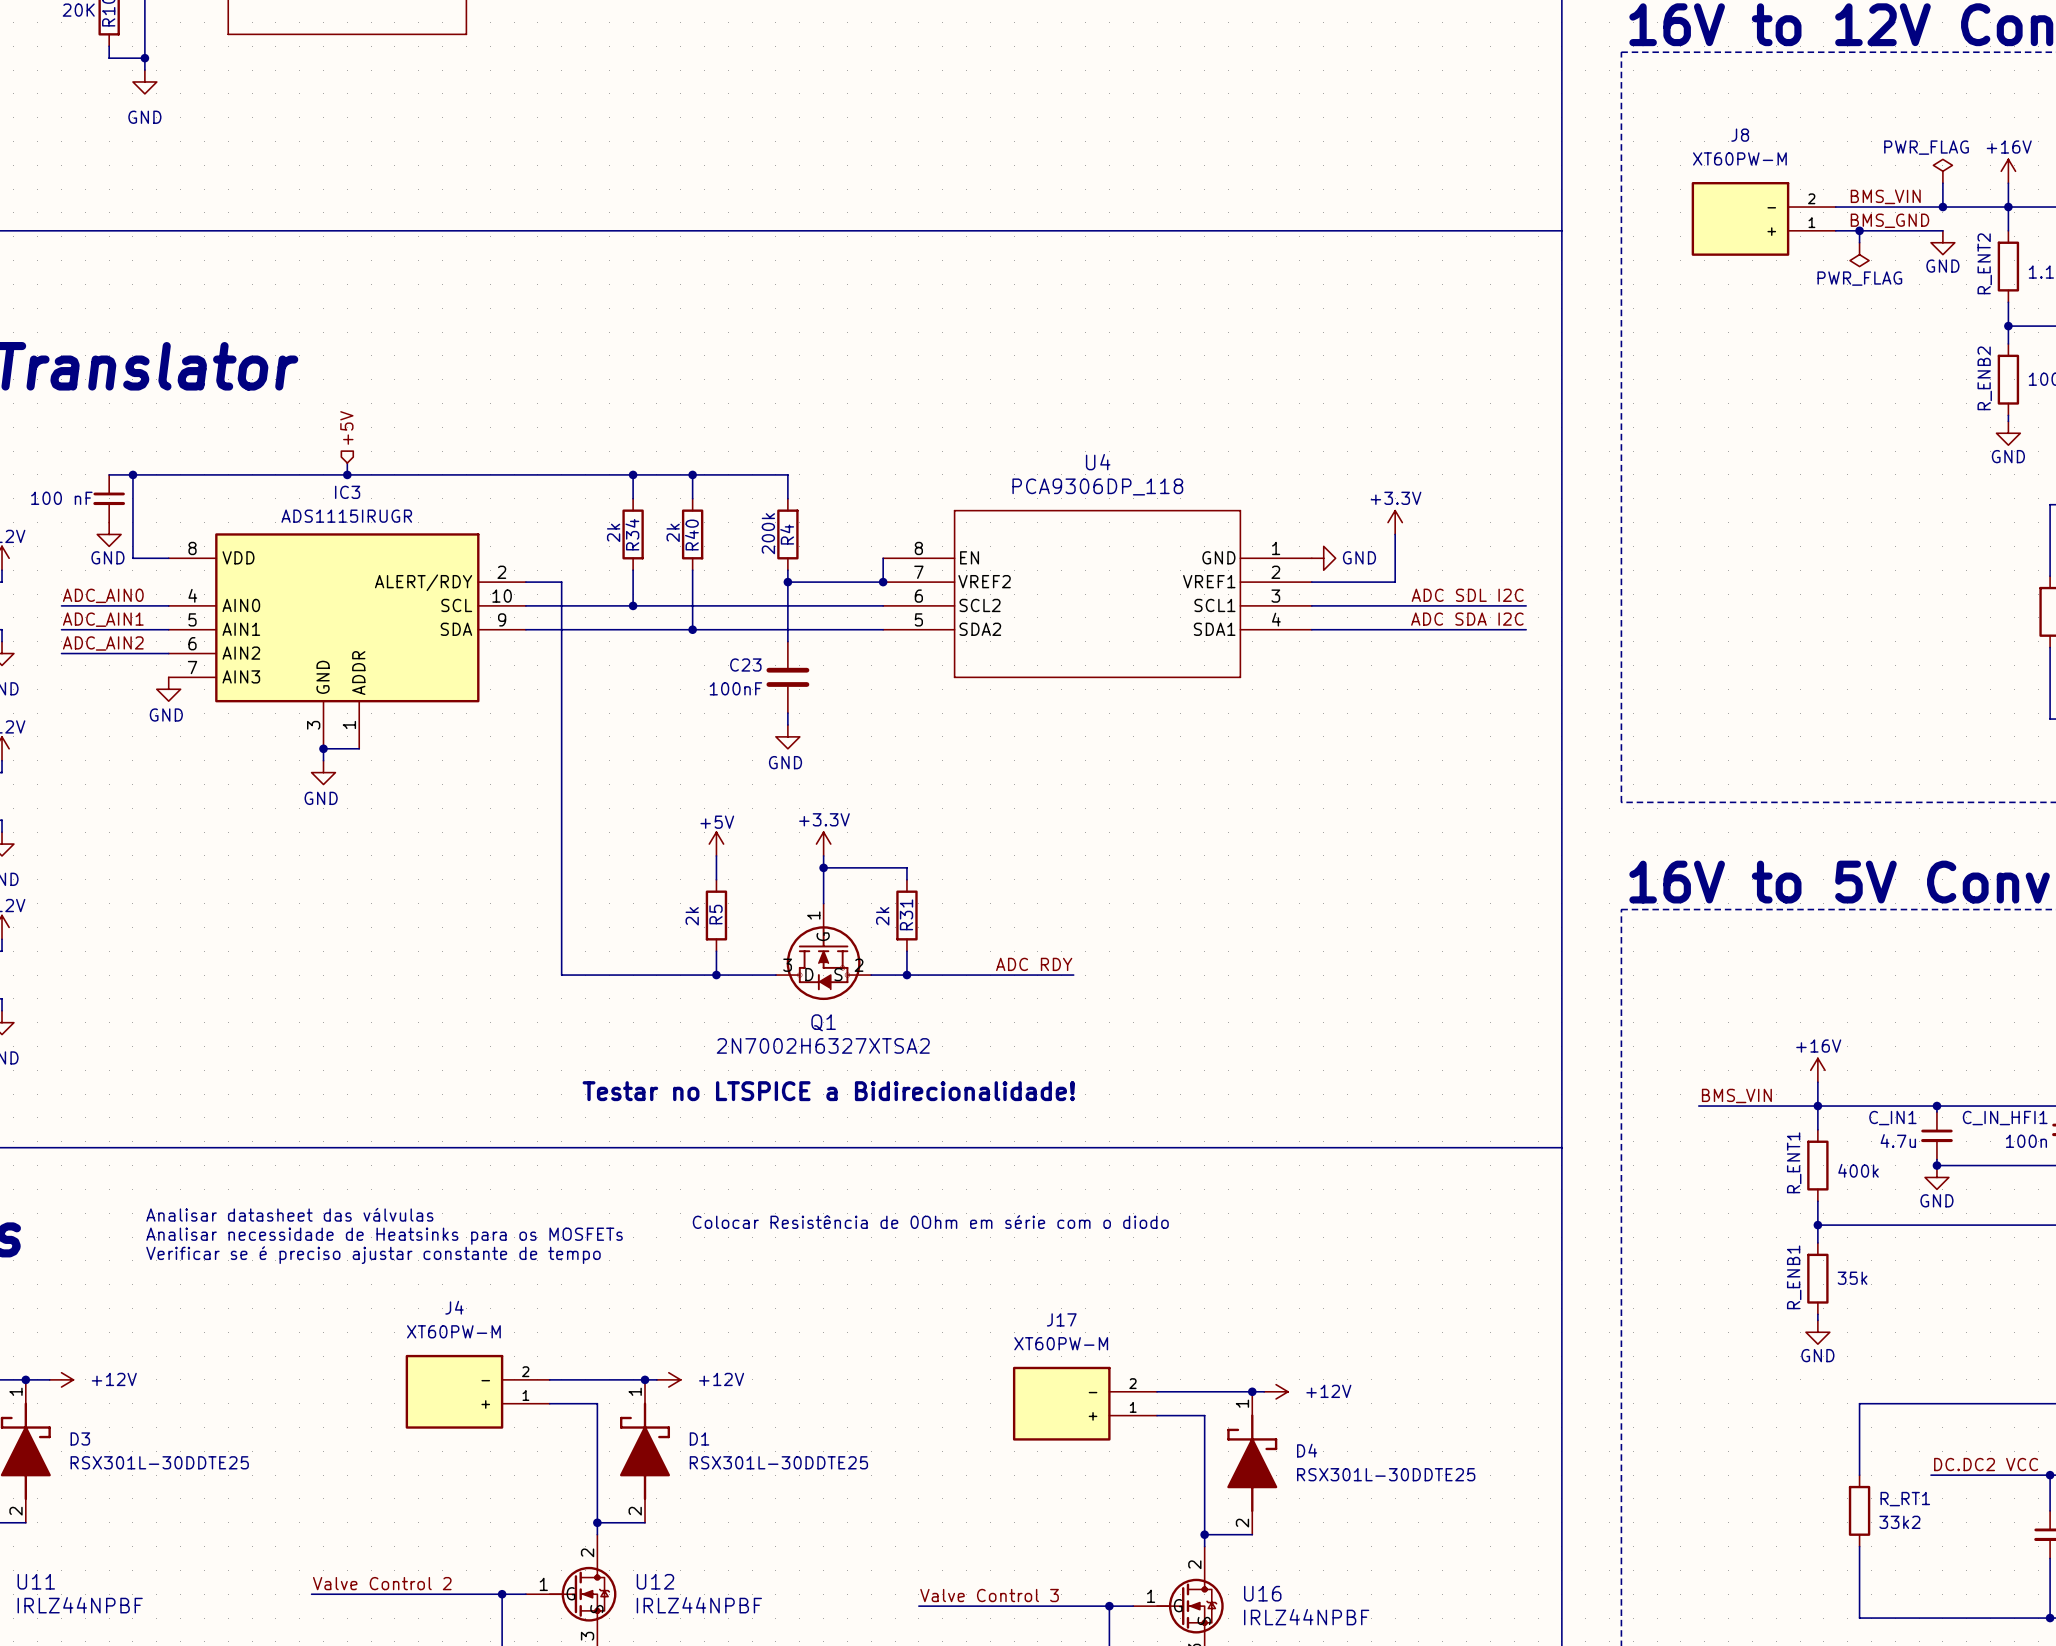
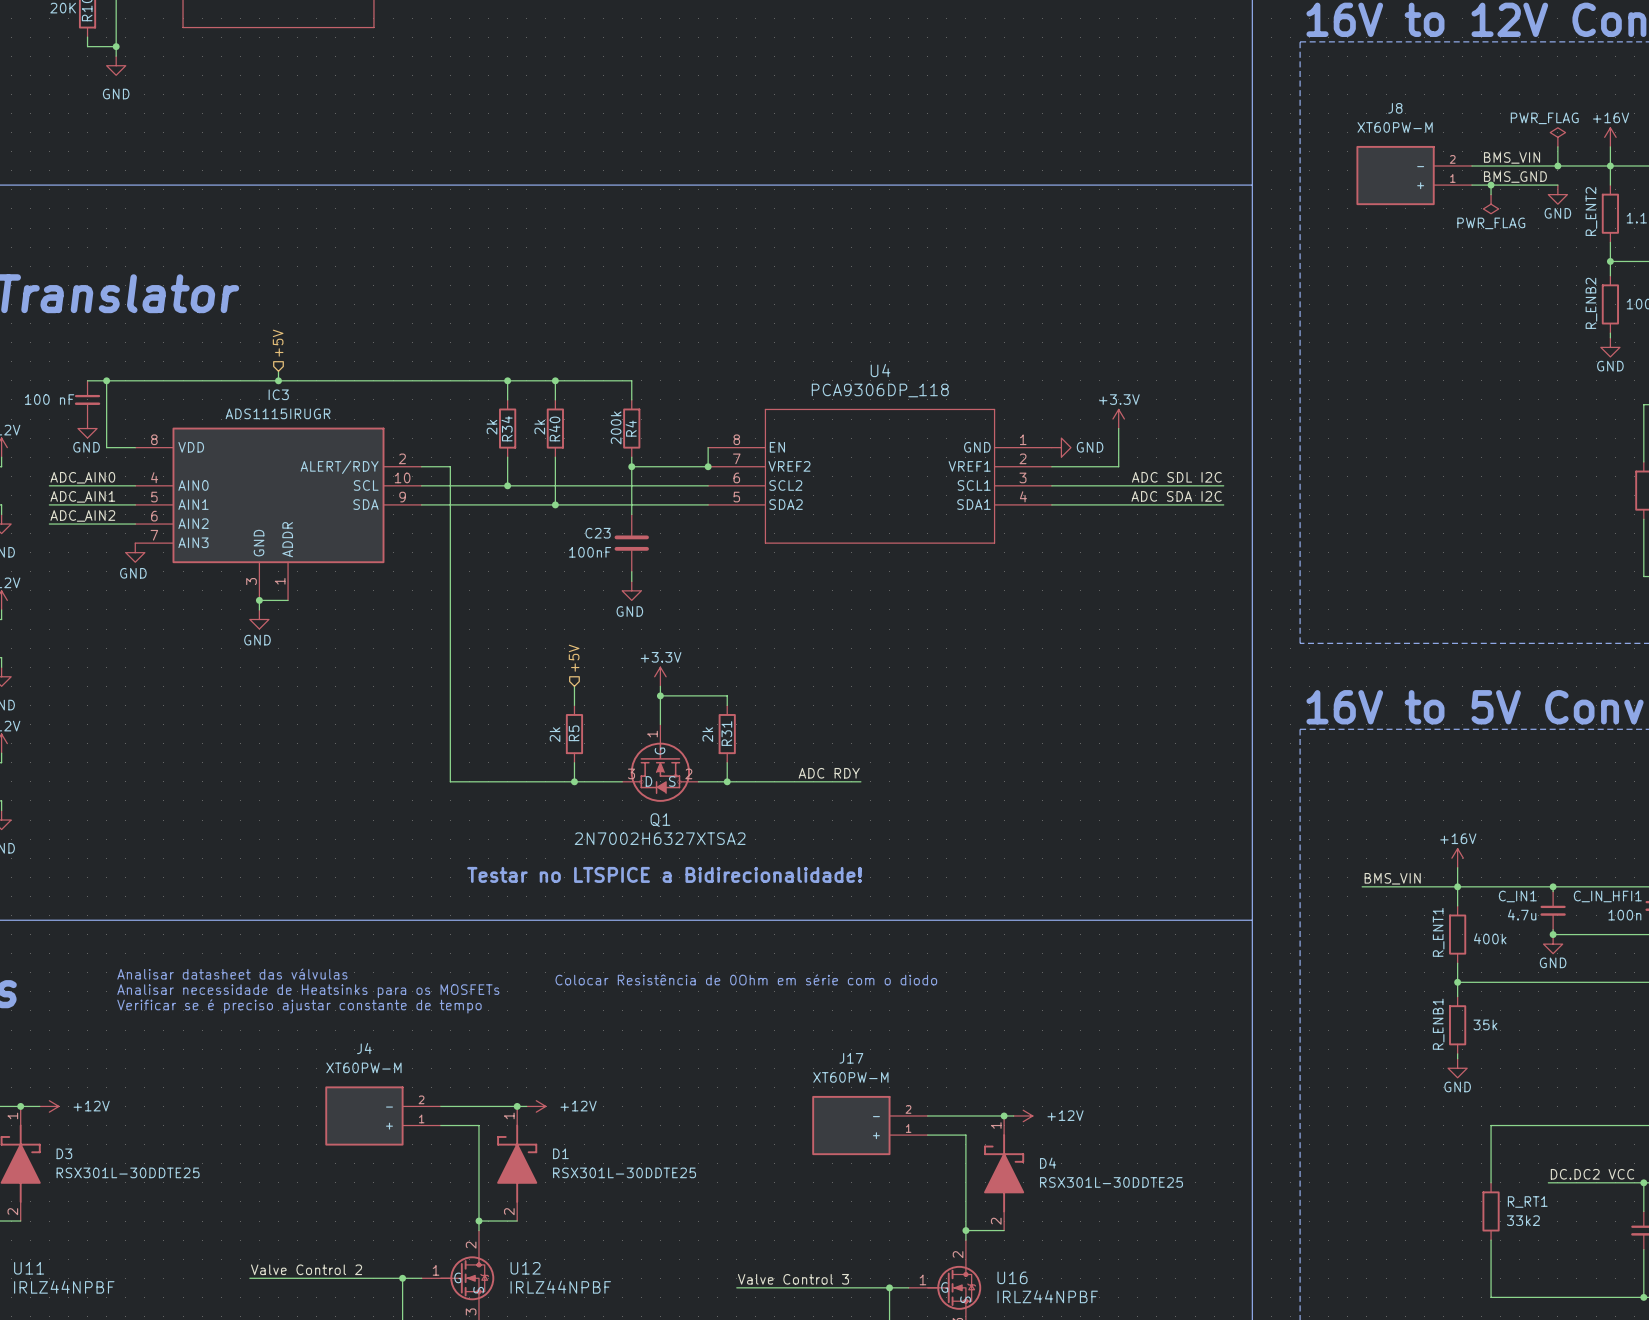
hierarchical label: none -> +5V (574, 658)
power symbol: +5V (716, 844) -> none

